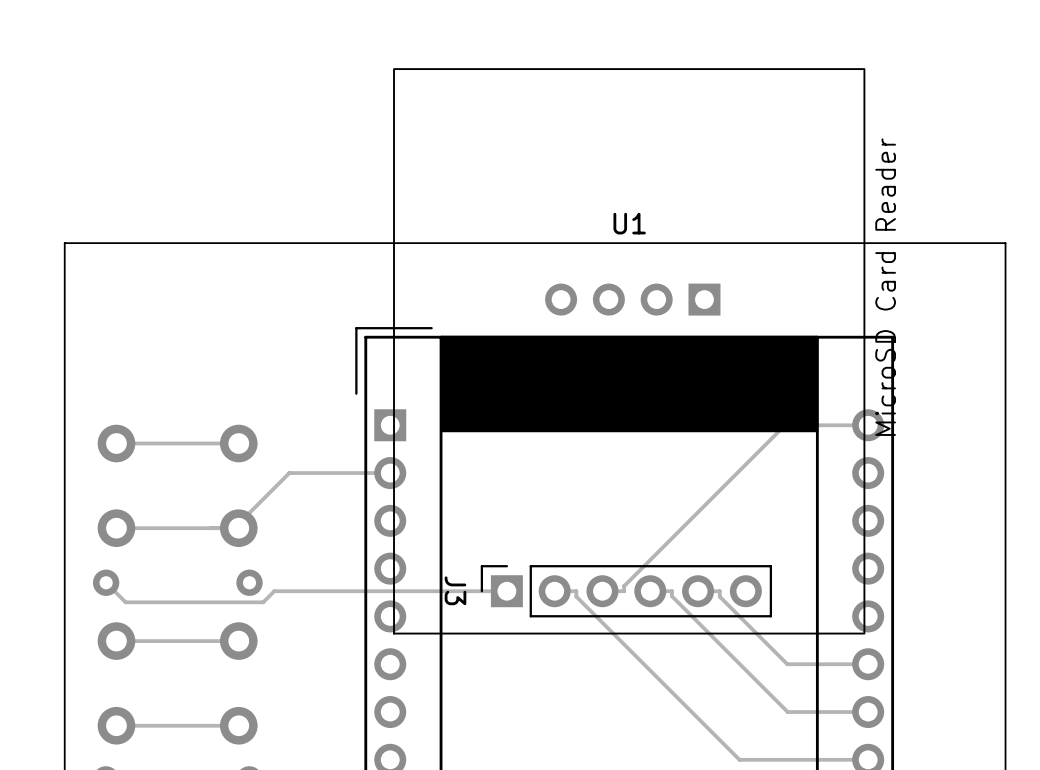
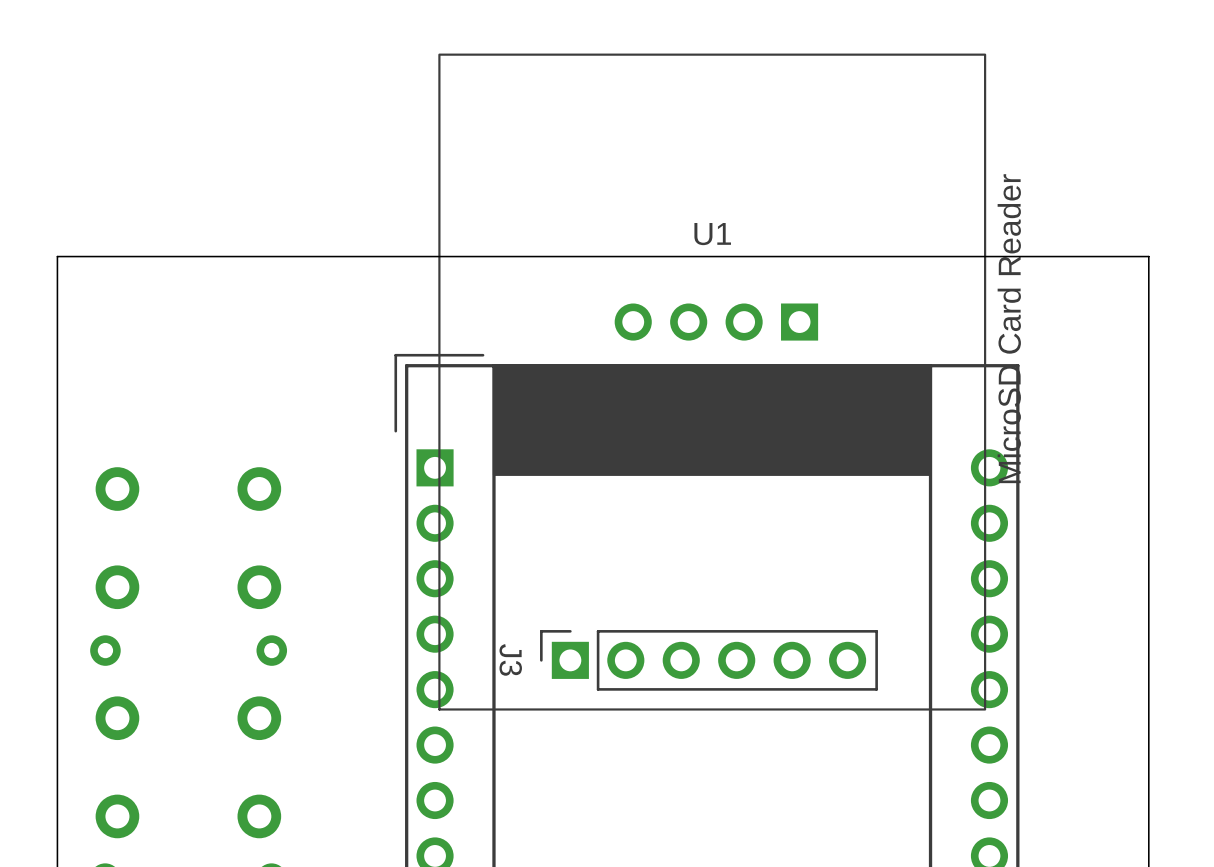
track: (868, 425) (785, 425) (624, 586) (624, 591) (602, 591) -> none
track: (238, 443) (116, 443) -> none
track: (390, 473) (289, 473) (234, 528) -> none
track: (238, 528) (116, 528) -> none
track: (106, 582) (125, 602) (263, 602) (274, 591) (506, 591) -> none
track: (554, 591) (576, 591) (576, 596) (739, 759) (868, 759) -> none
track: (650, 591) (671, 591) (671, 596) (787, 712) (868, 712) -> none
track: (698, 591) (719, 591) (719, 596) (787, 664) (868, 664) -> none
track: (238, 641) (116, 641) -> none
track: (238, 725) (116, 725) -> none

